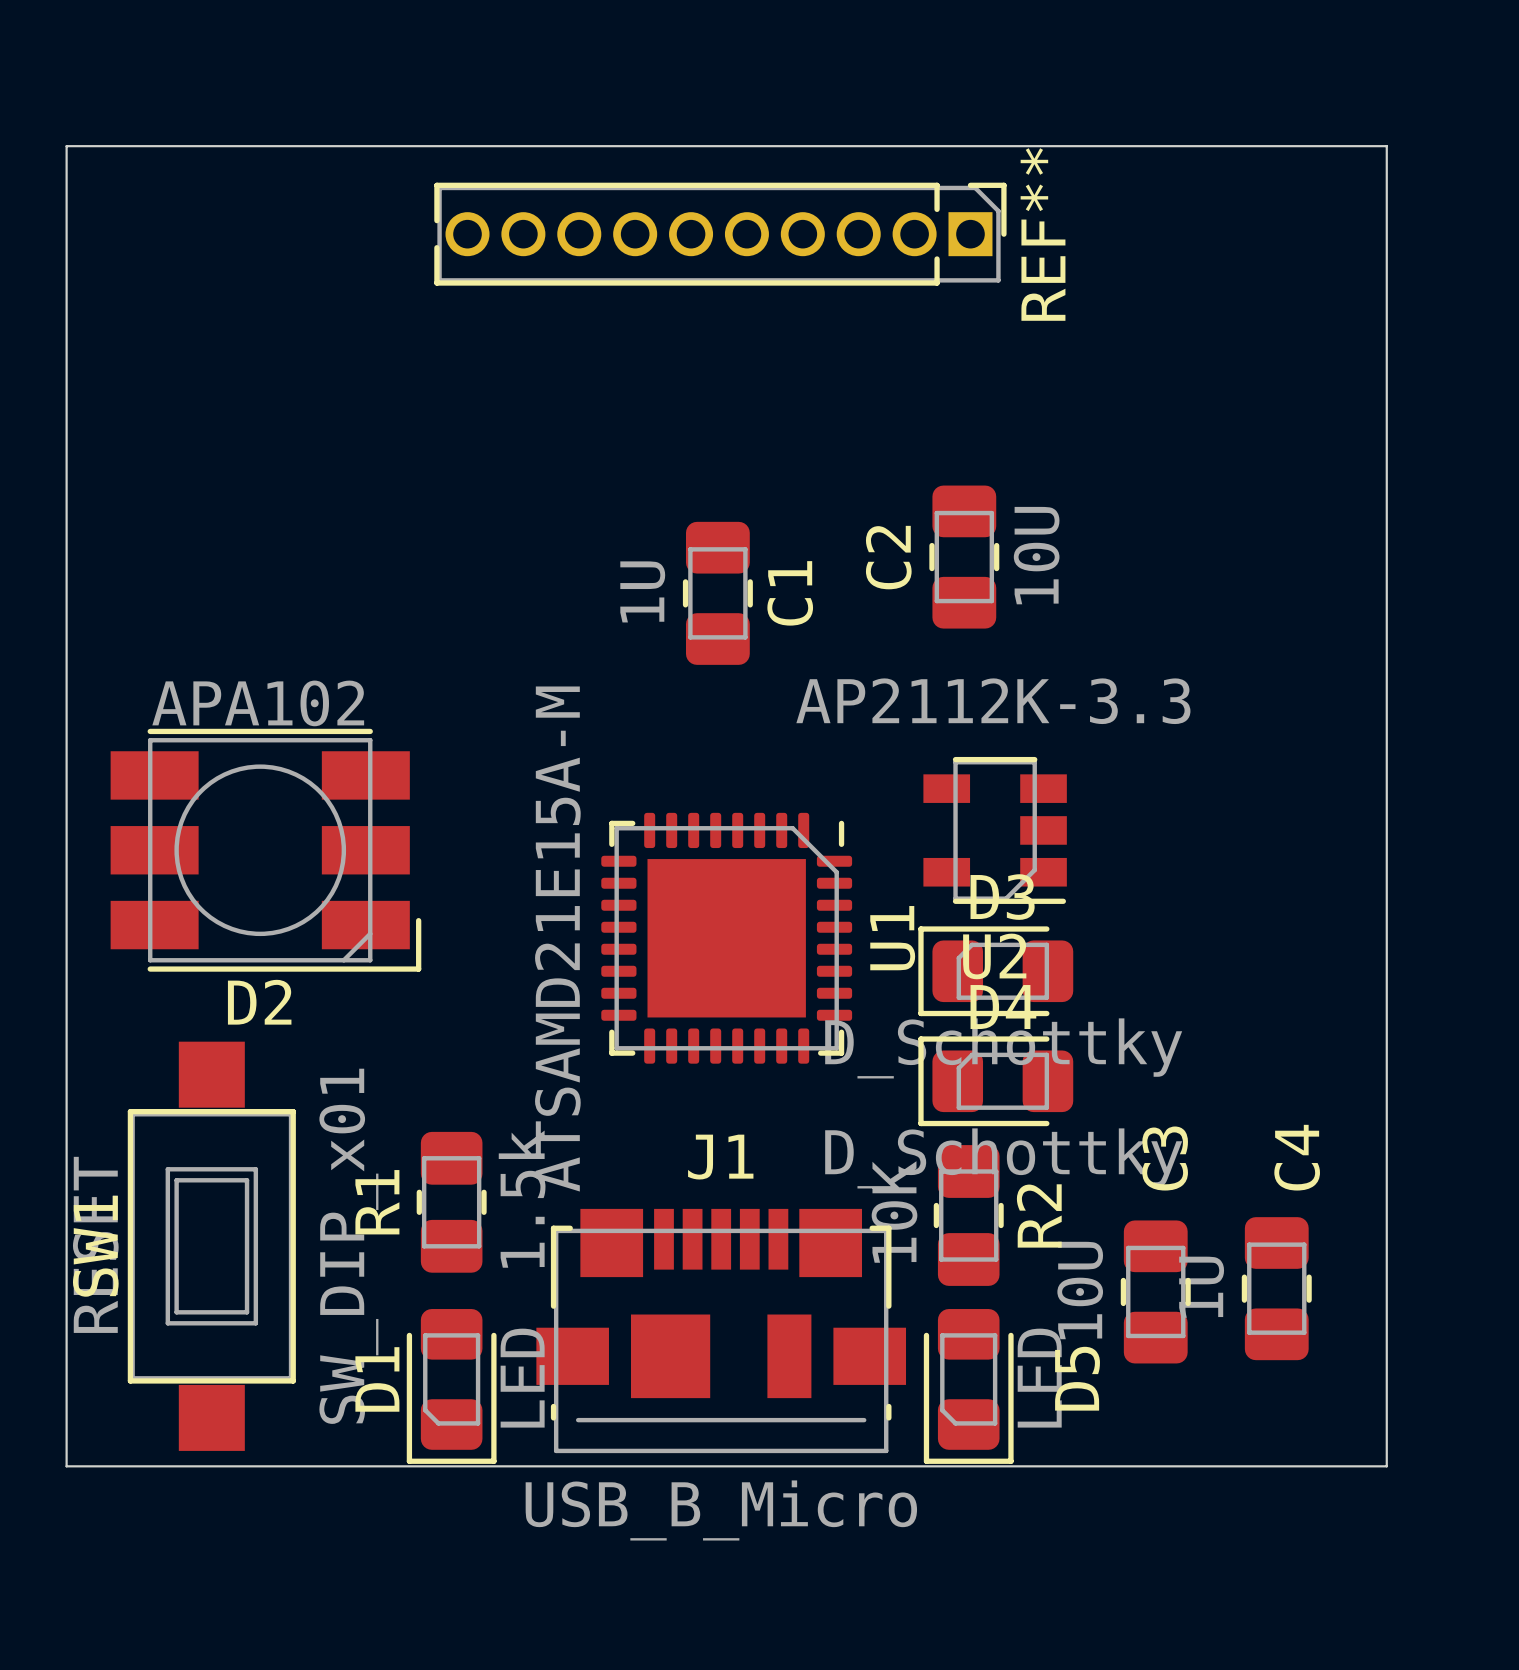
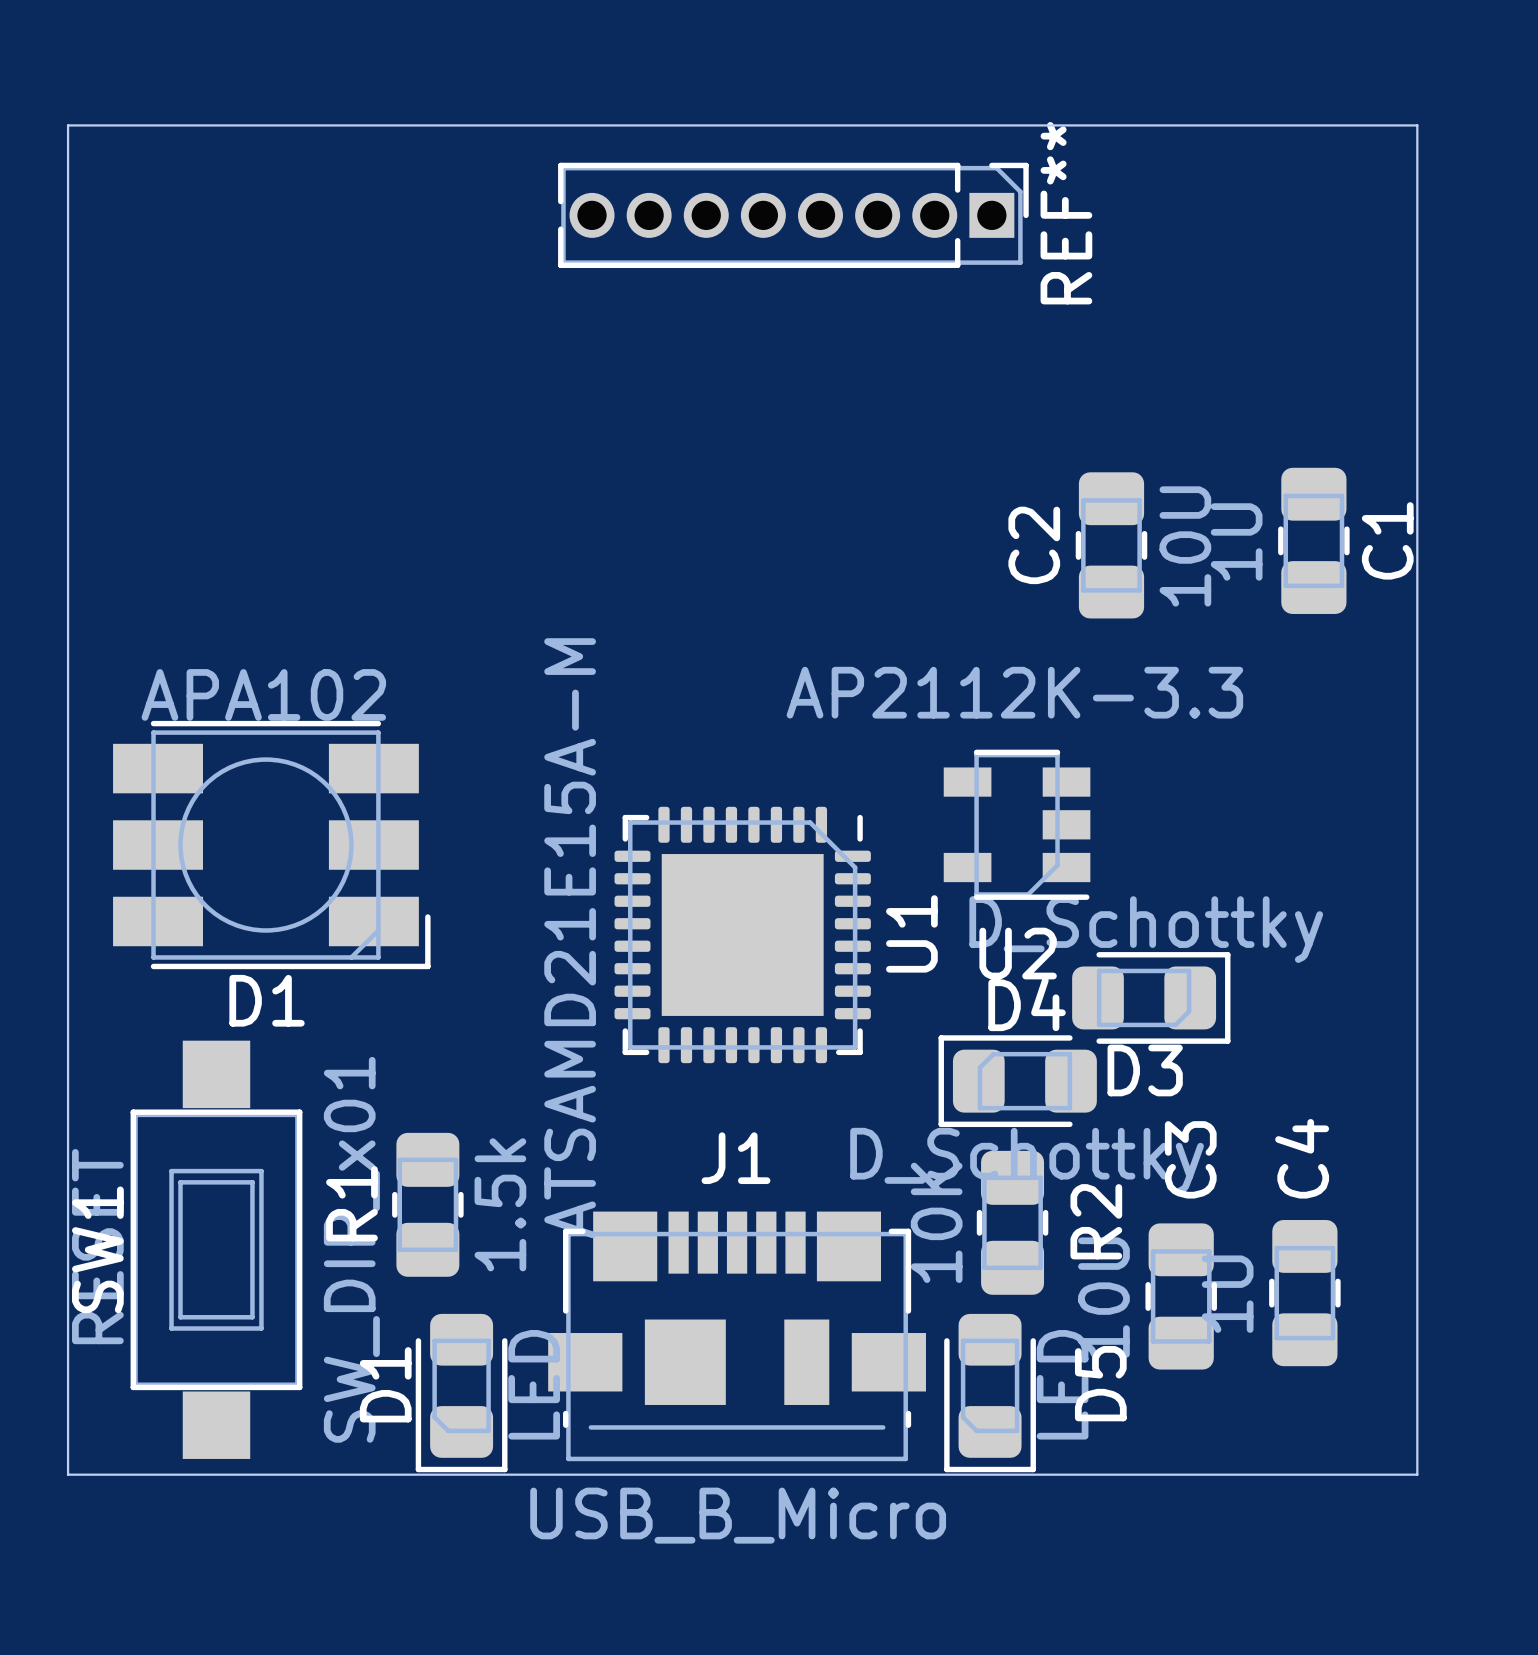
REF**: (720, 234) -> none
REF**: none -> (793, 215)
C2 position: (964, 557) -> (1111, 545)
C1 position: (717, 593) -> (1313, 540)
D3 rotation: 0° (995, 971) -> 180° (1151, 997)
D3 position: (995, 971) -> (1151, 997)
D2 name: D2 (259, 1002) -> D1 (267, 1000)
C4 name position: C4 (1297, 1157) -> C4 (1302, 1158)
R1 position: (451, 1202) -> (427, 1204)
R2 position: (968, 1215) -> (1012, 1222)
R2 name position: R2 (1039, 1215) -> R2 (1096, 1221)

